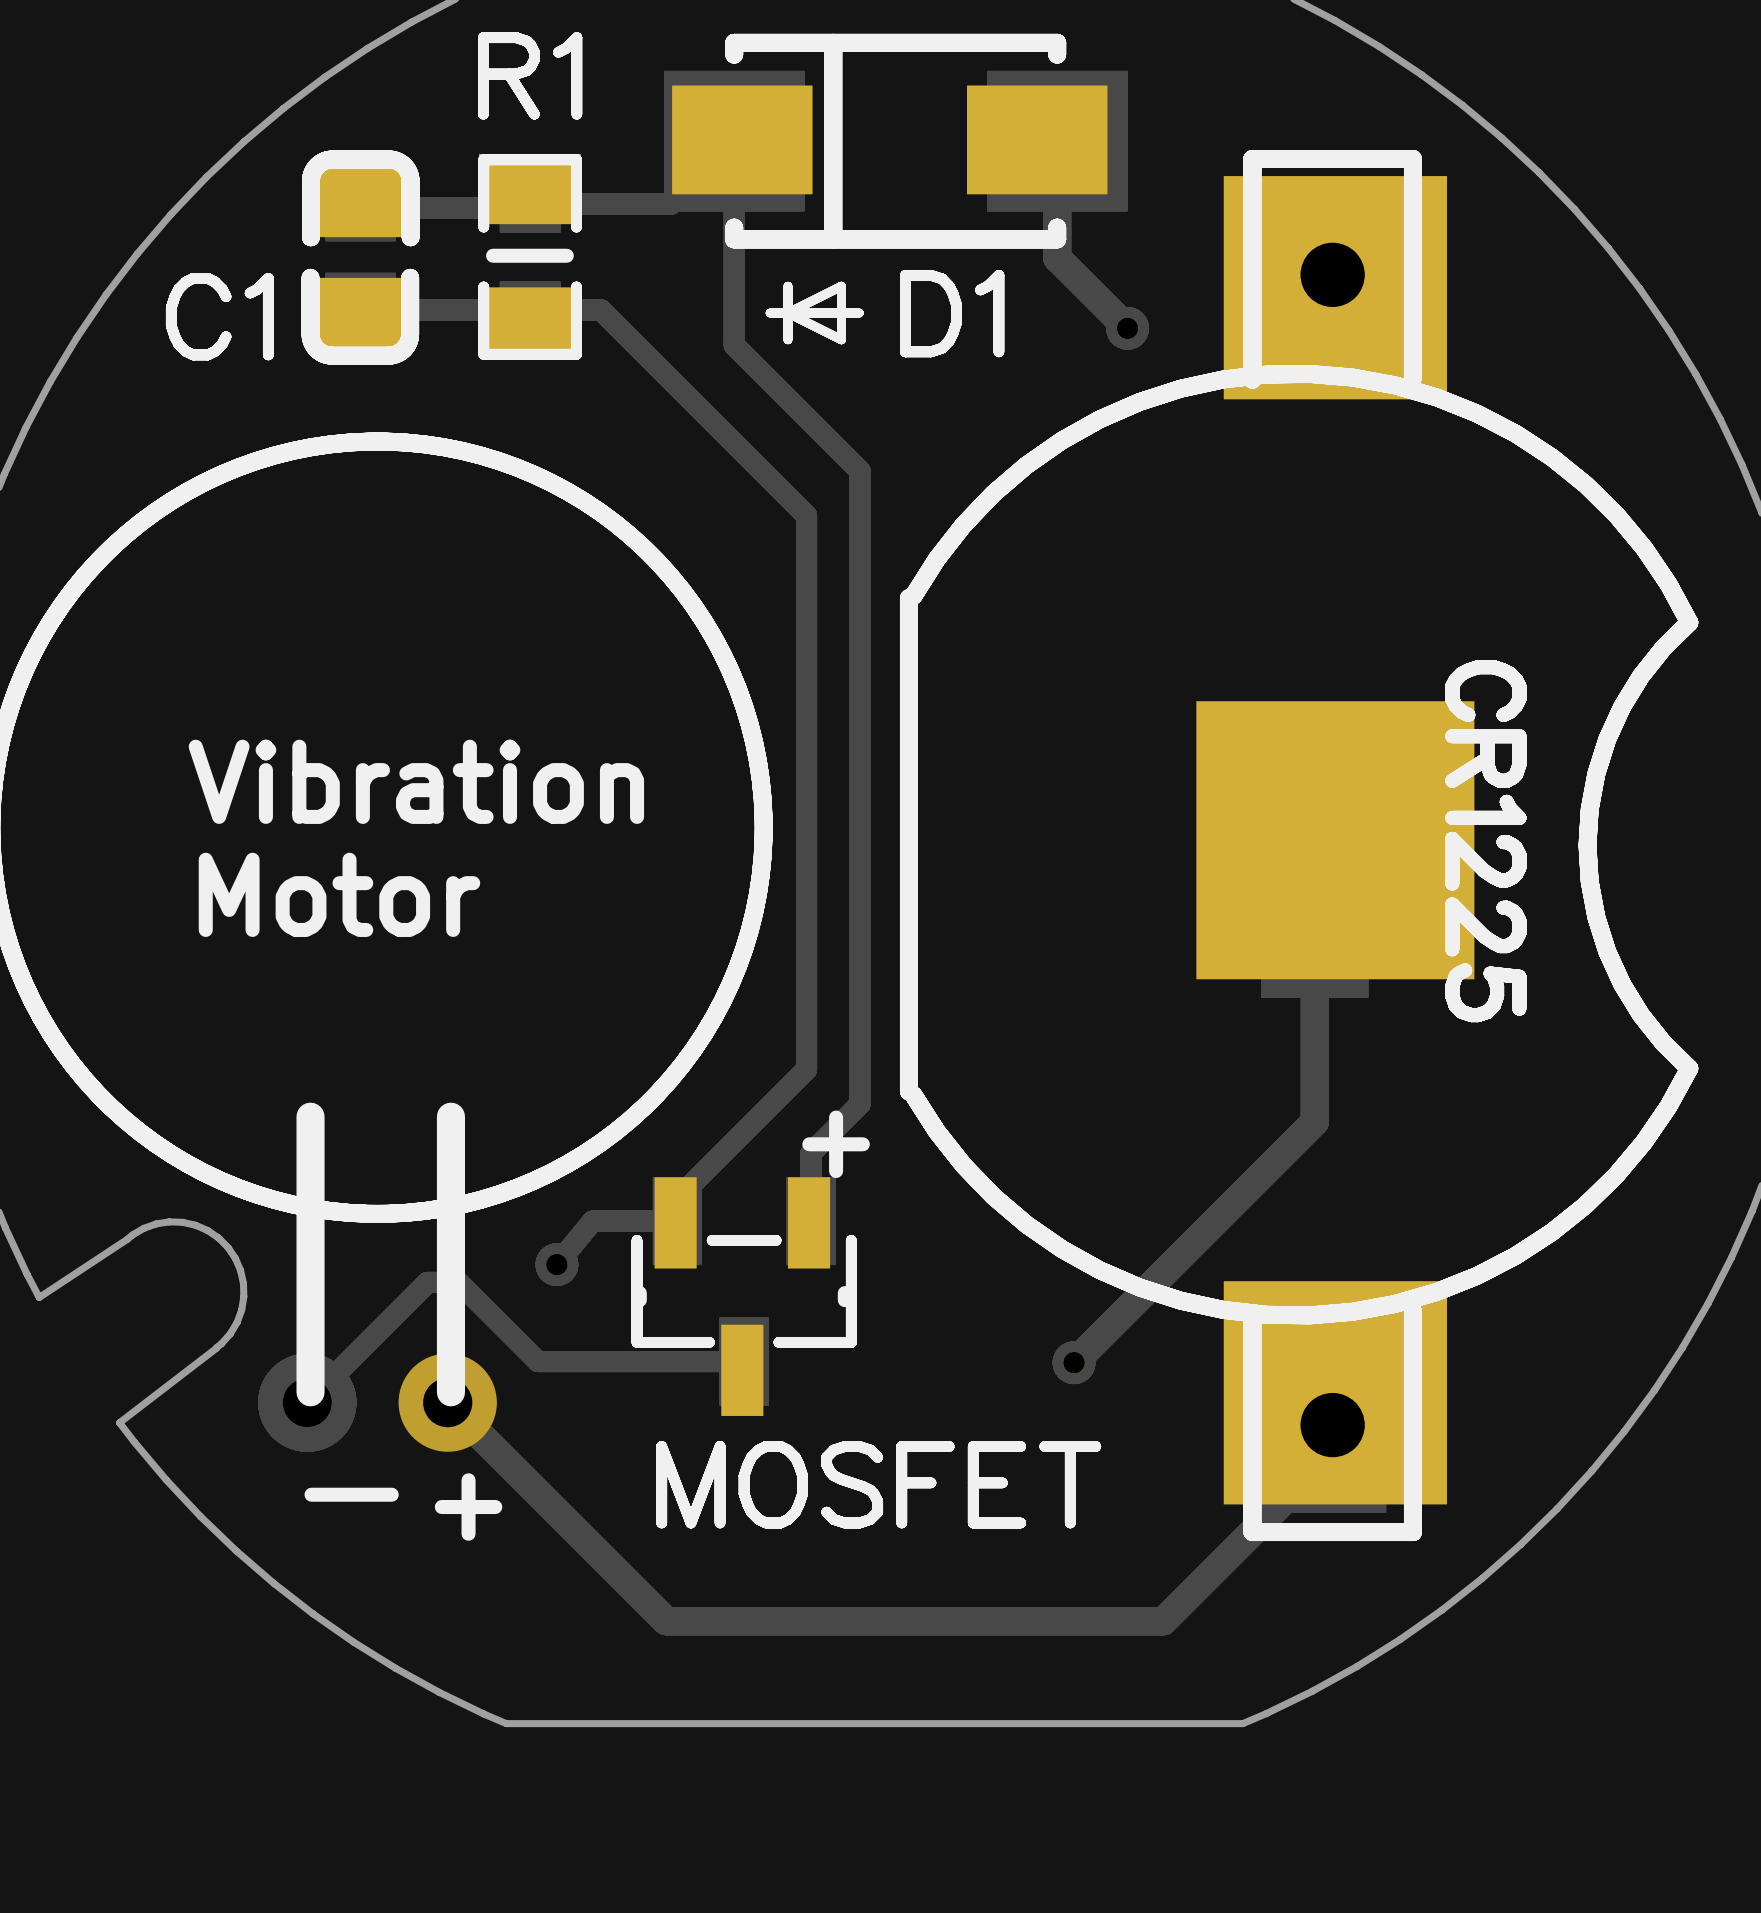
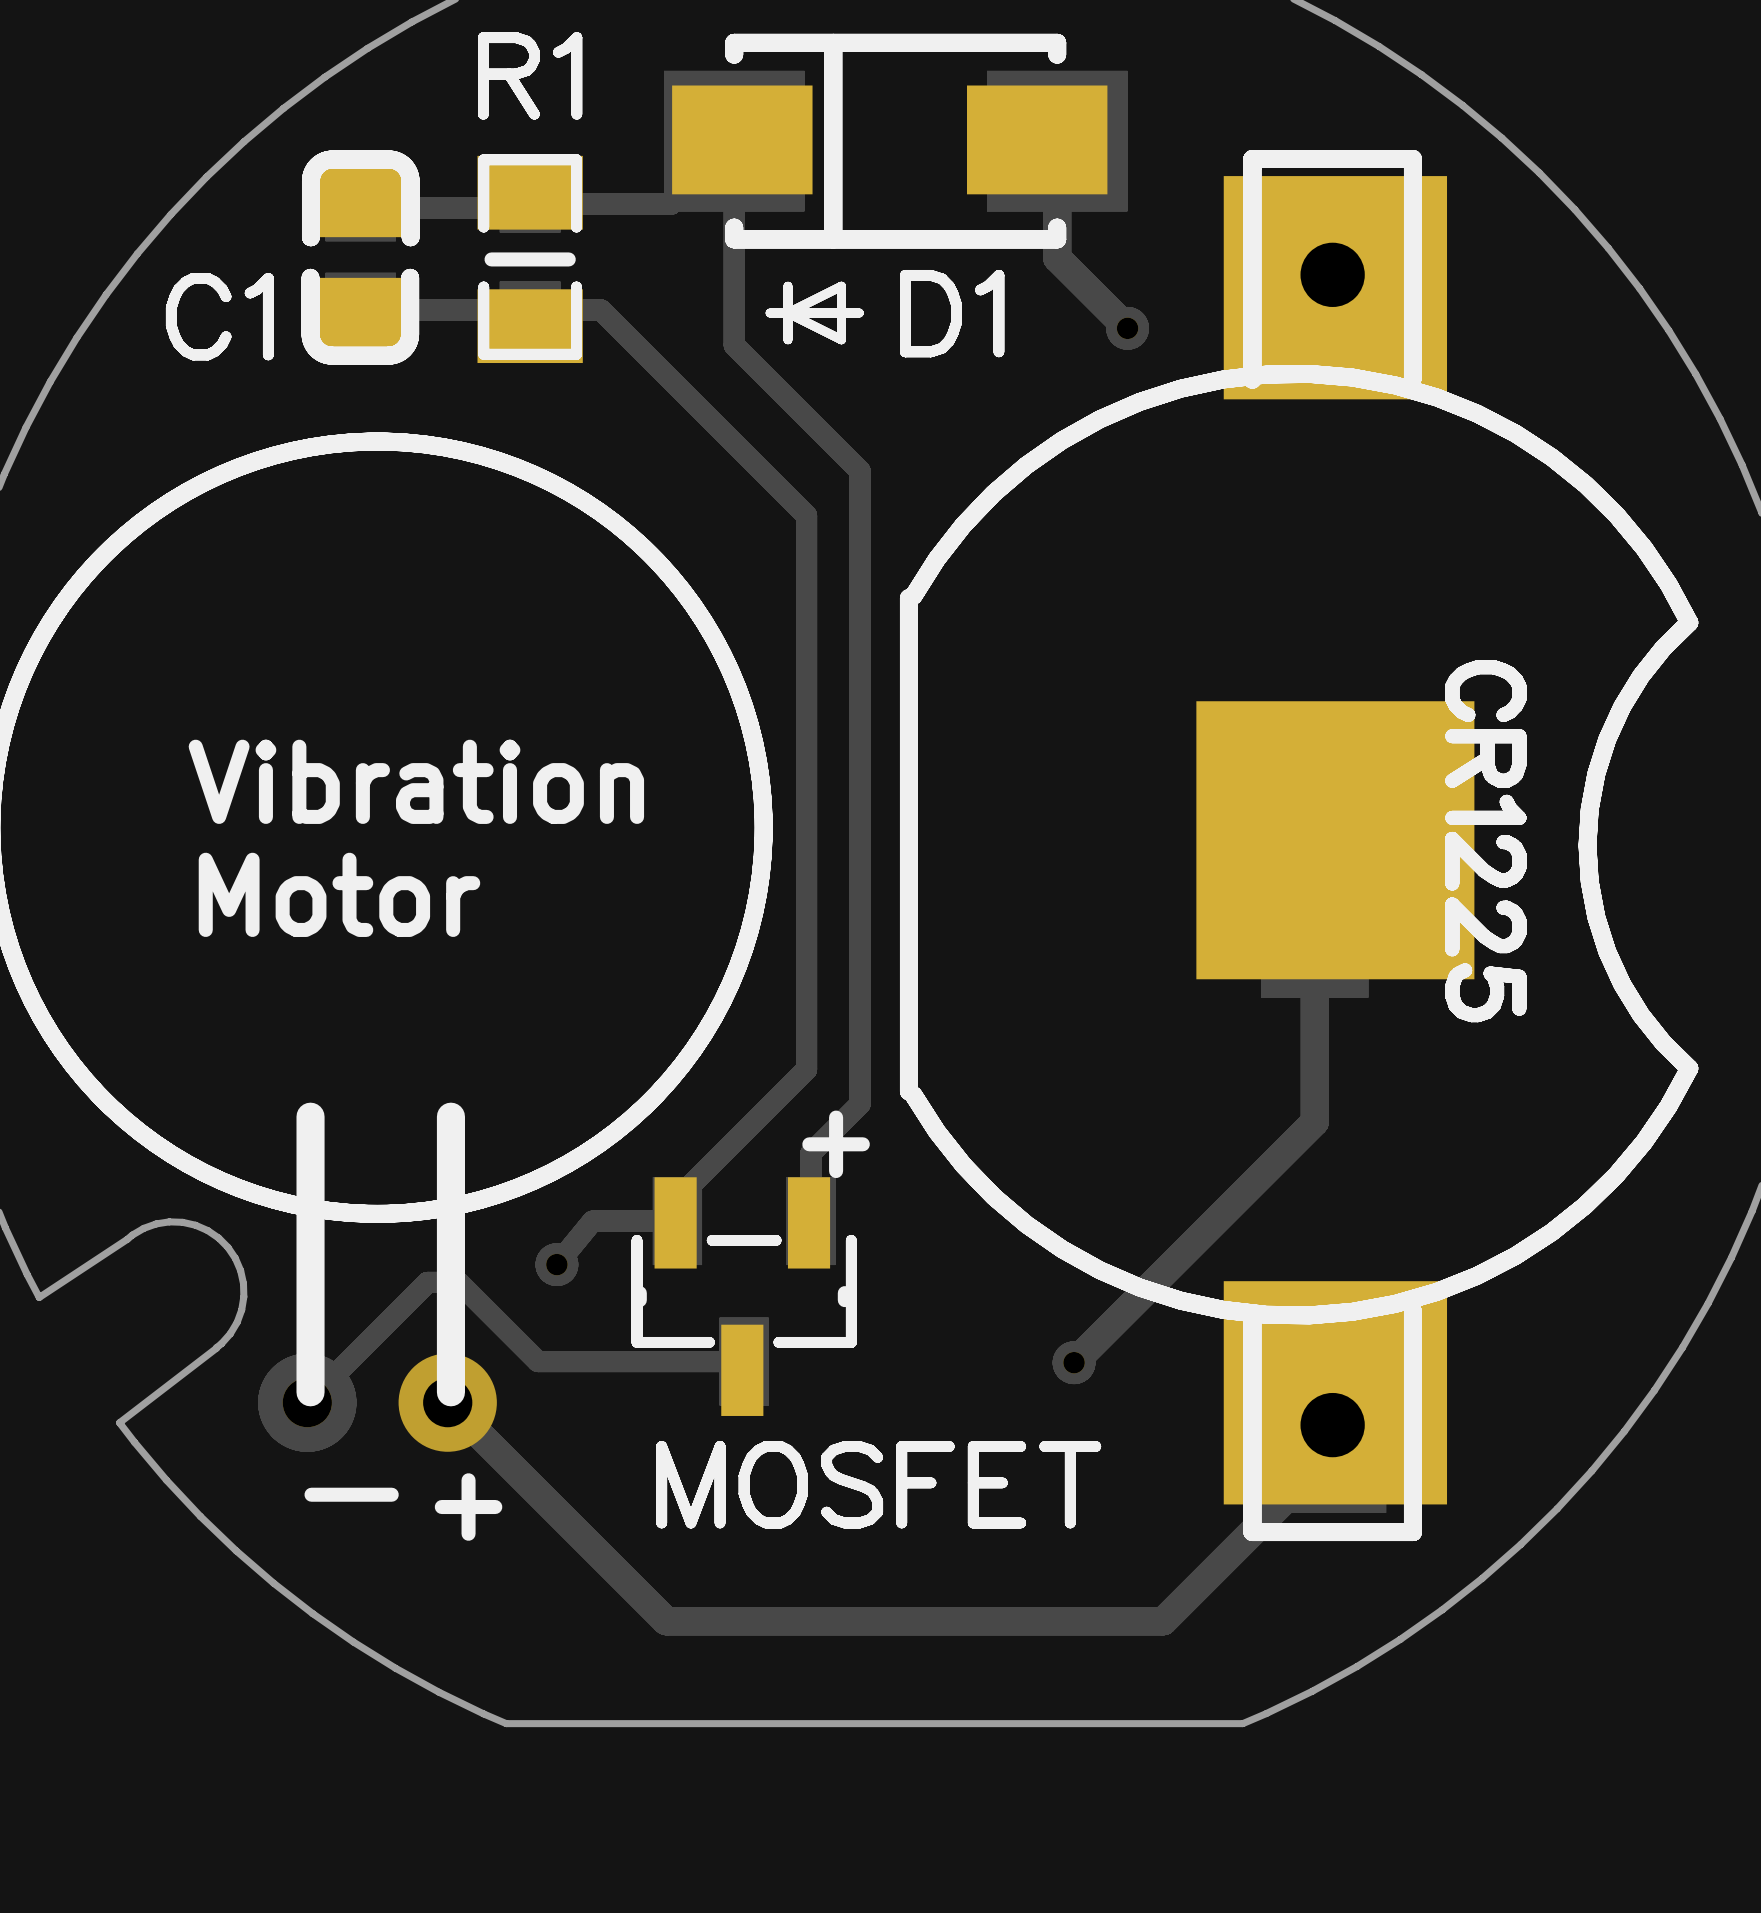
part footprint: [479, 153, 581, 358] -> [477, 155, 583, 364]

